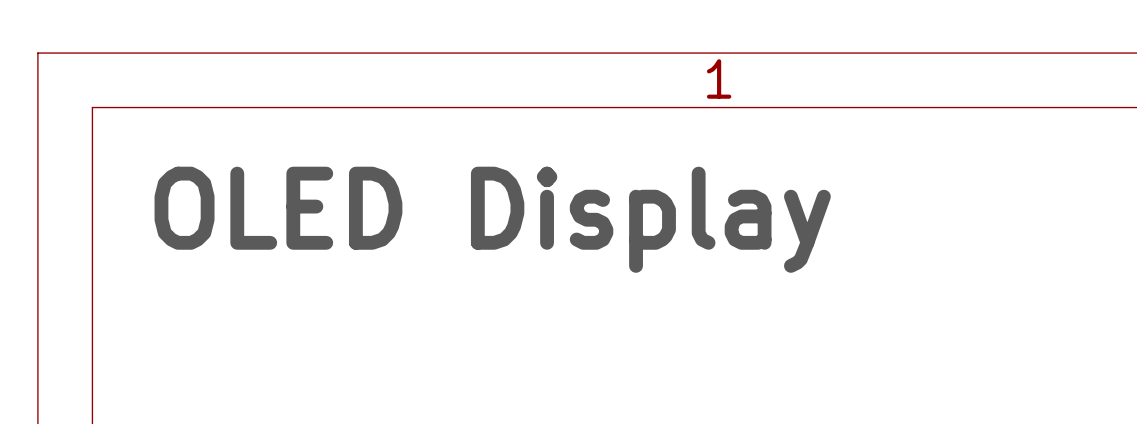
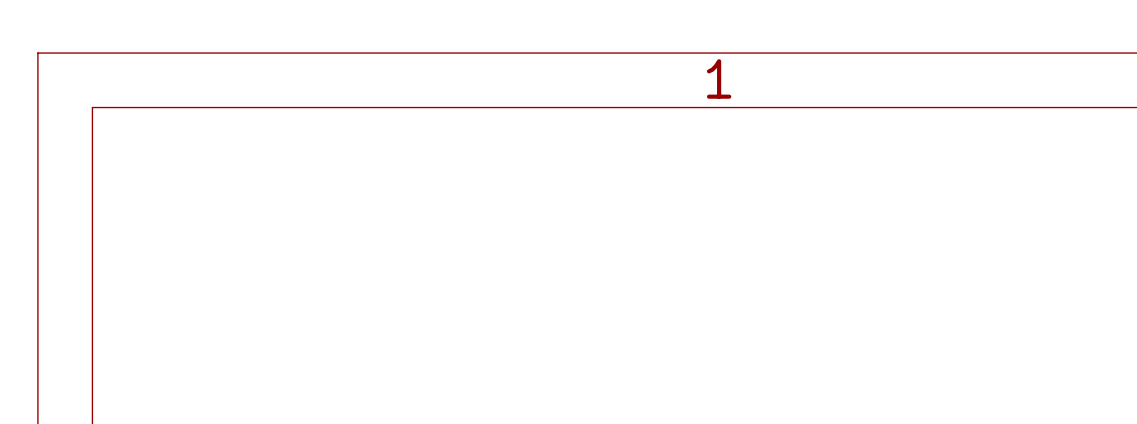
text: OLED Display (492, 219) -> none

